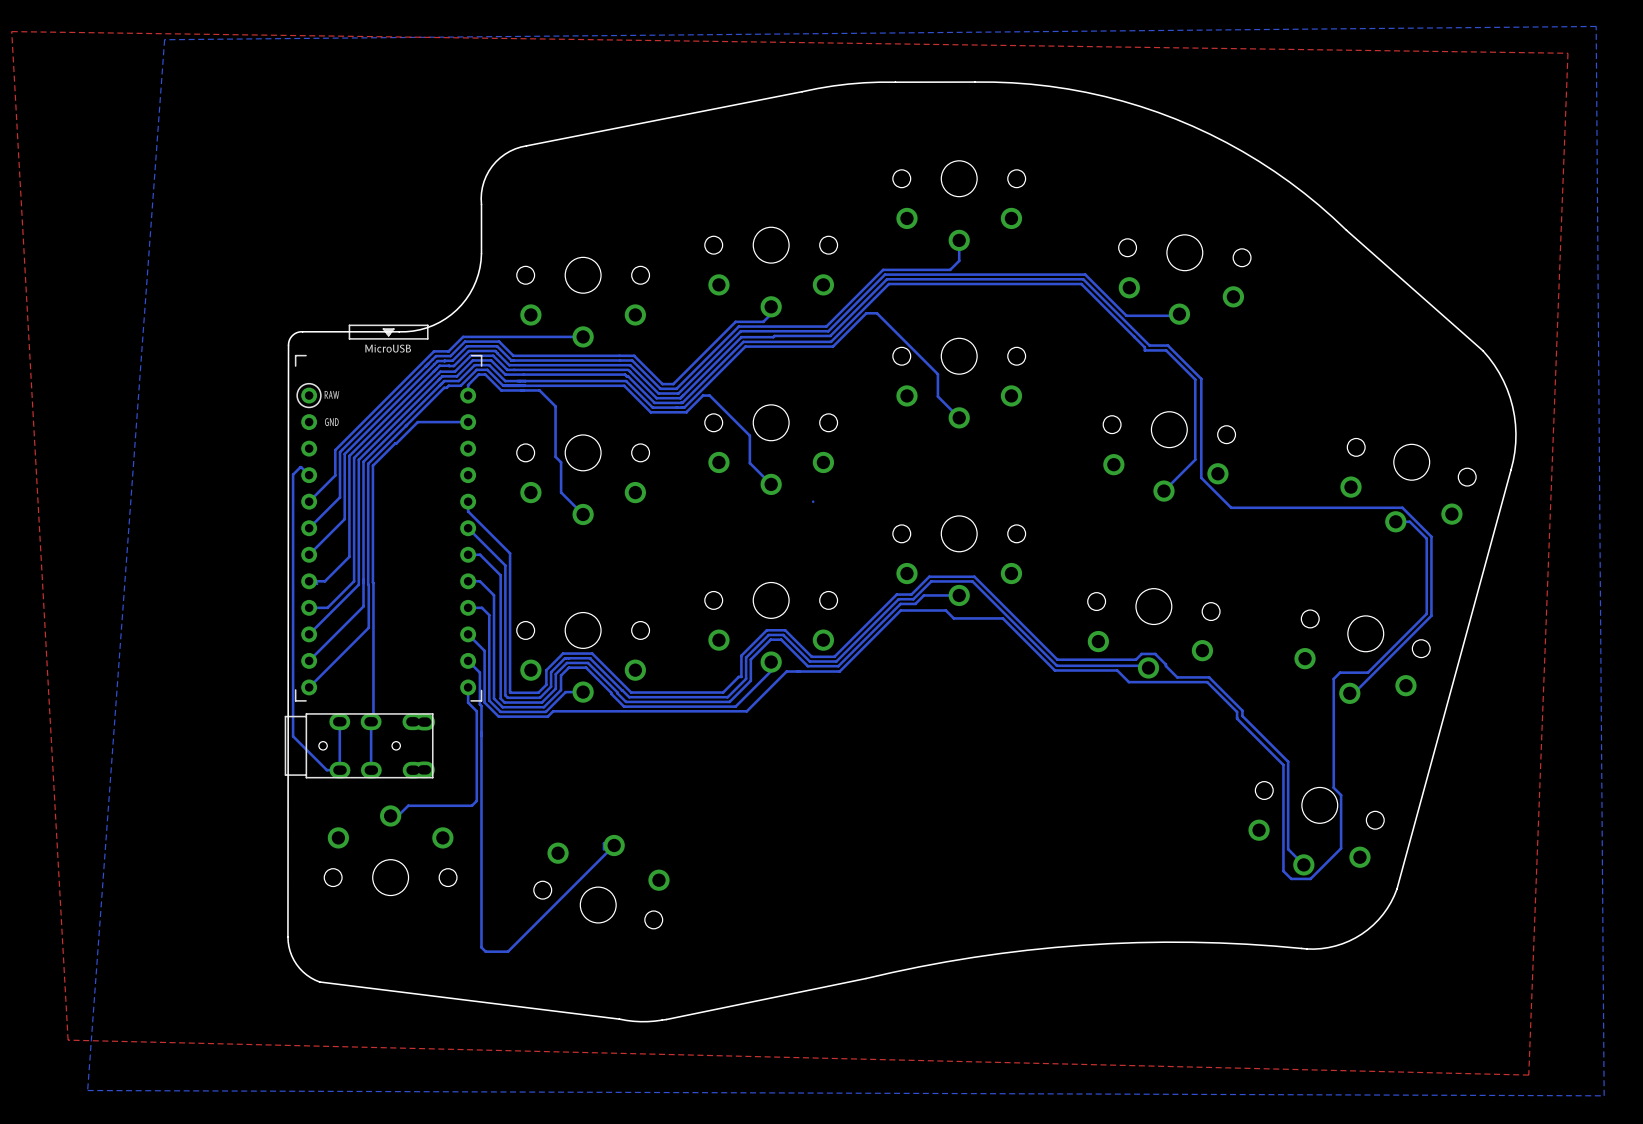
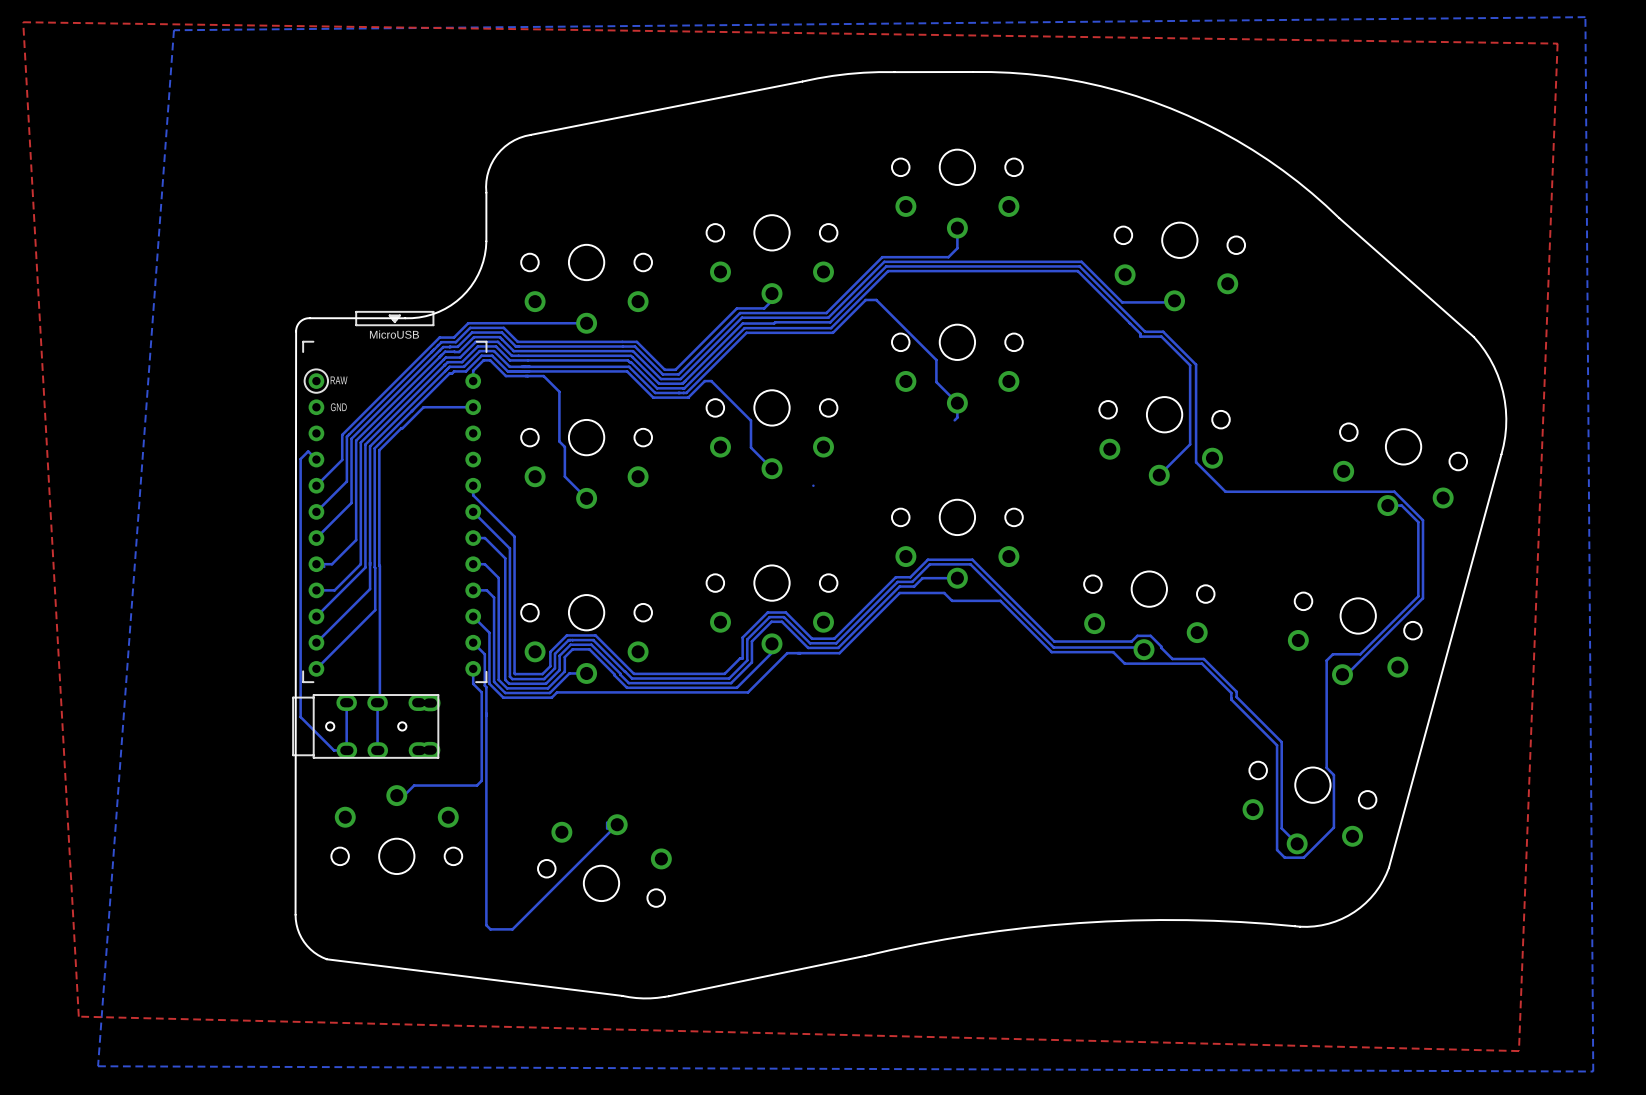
bottom track: none -> (957, 403) (957, 417) (954, 420)

